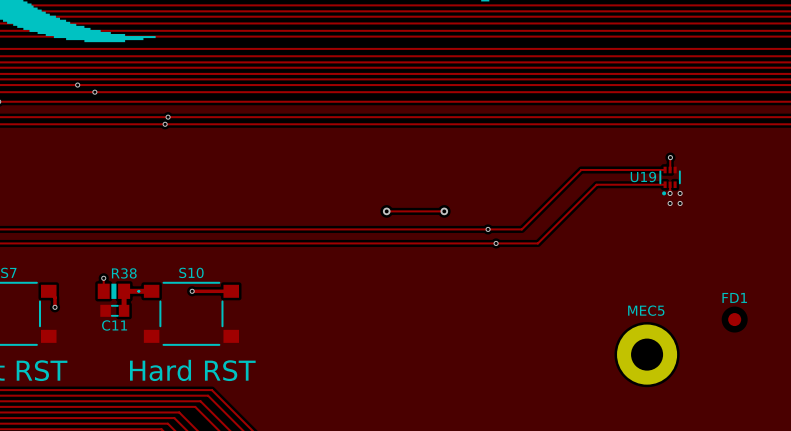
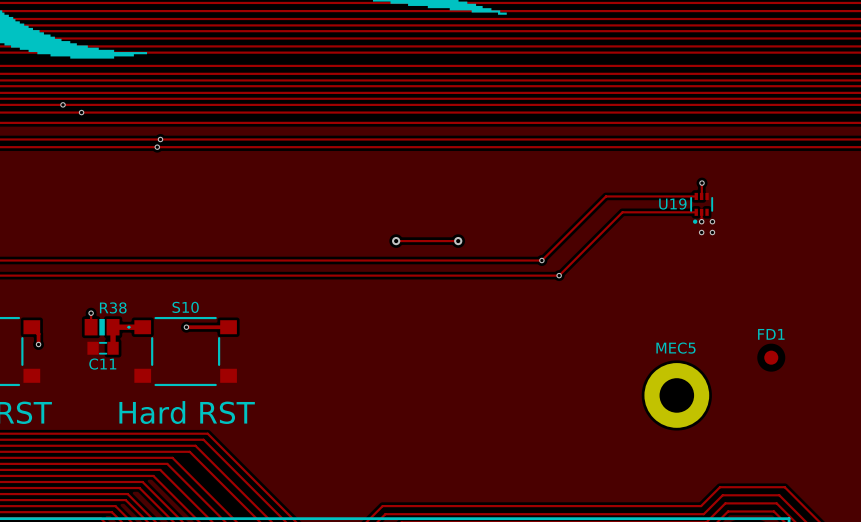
via: (488, 229) -> none
via: none -> (541, 260)
via: (496, 243) -> none
via: none -> (559, 275)

